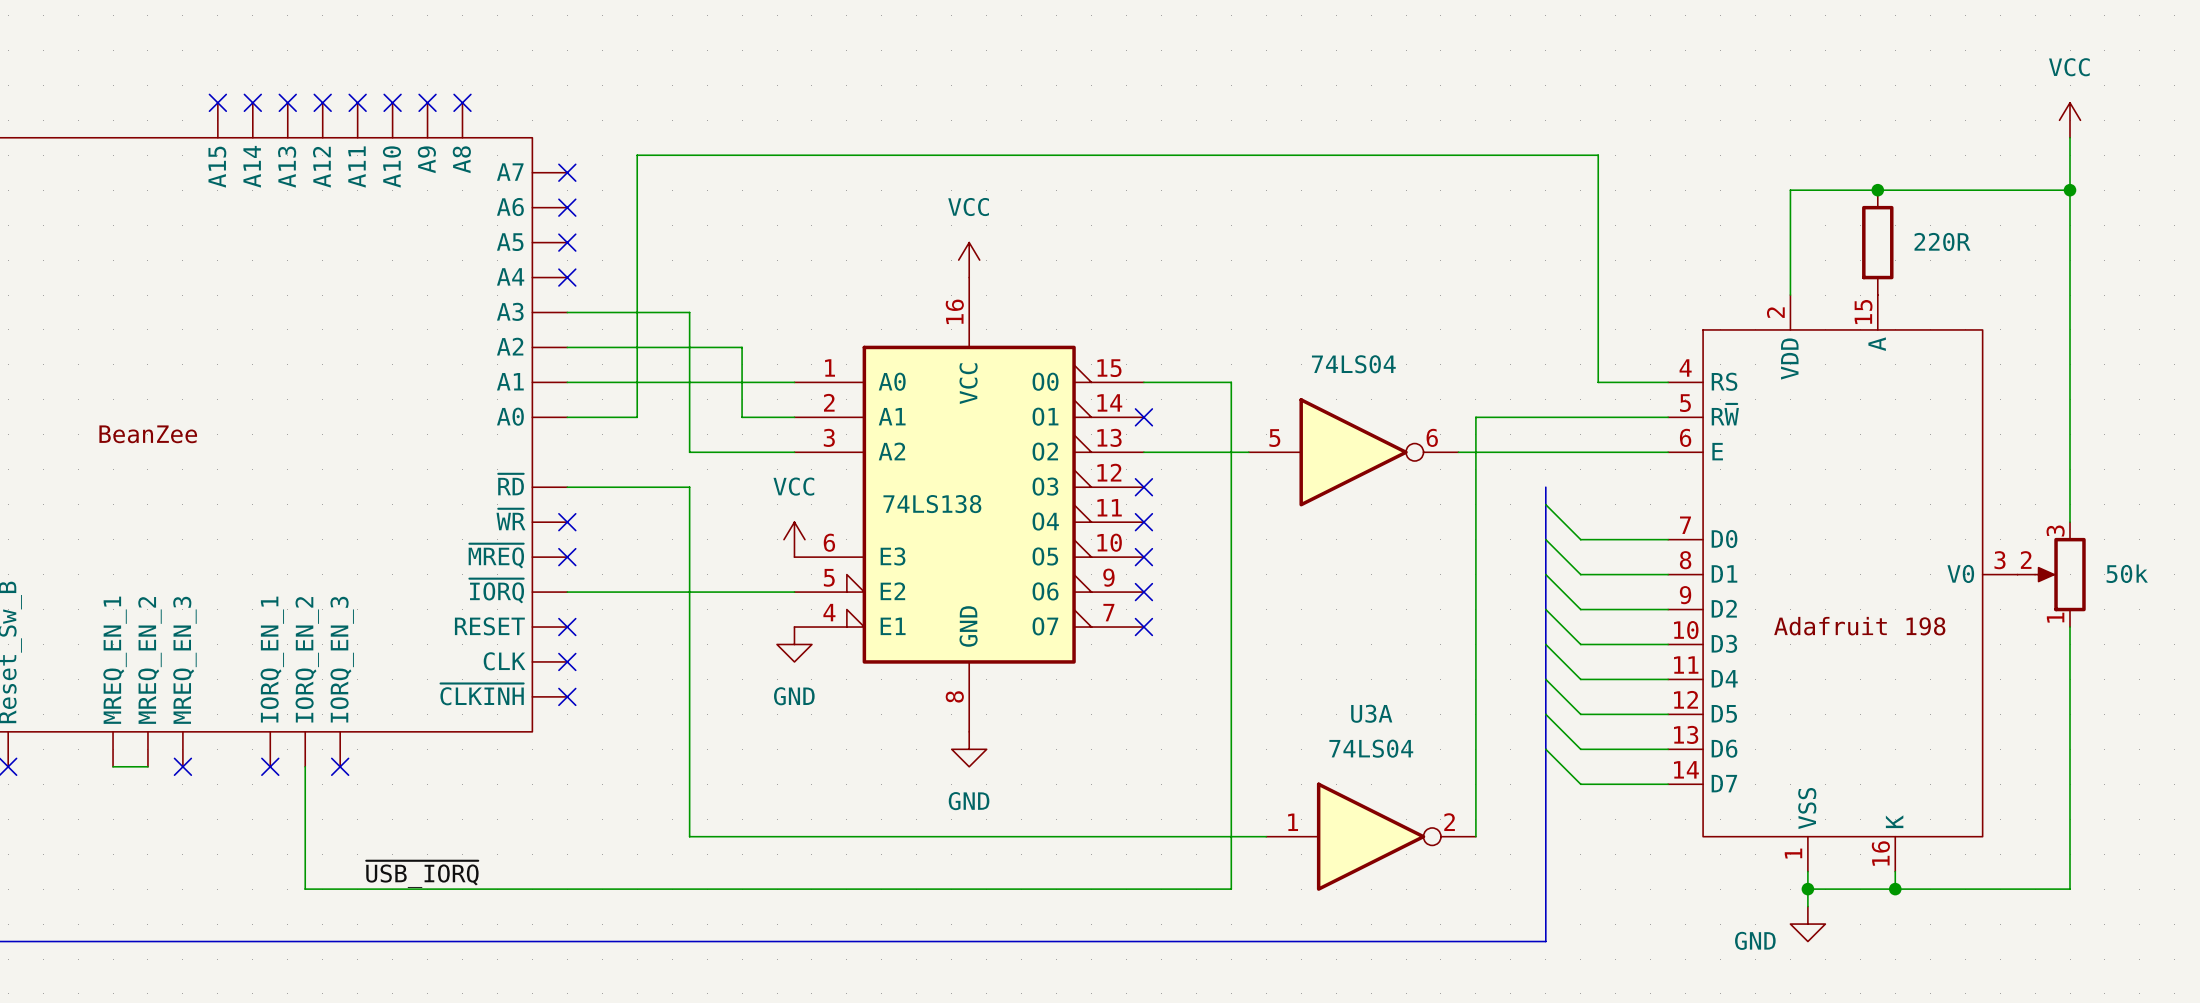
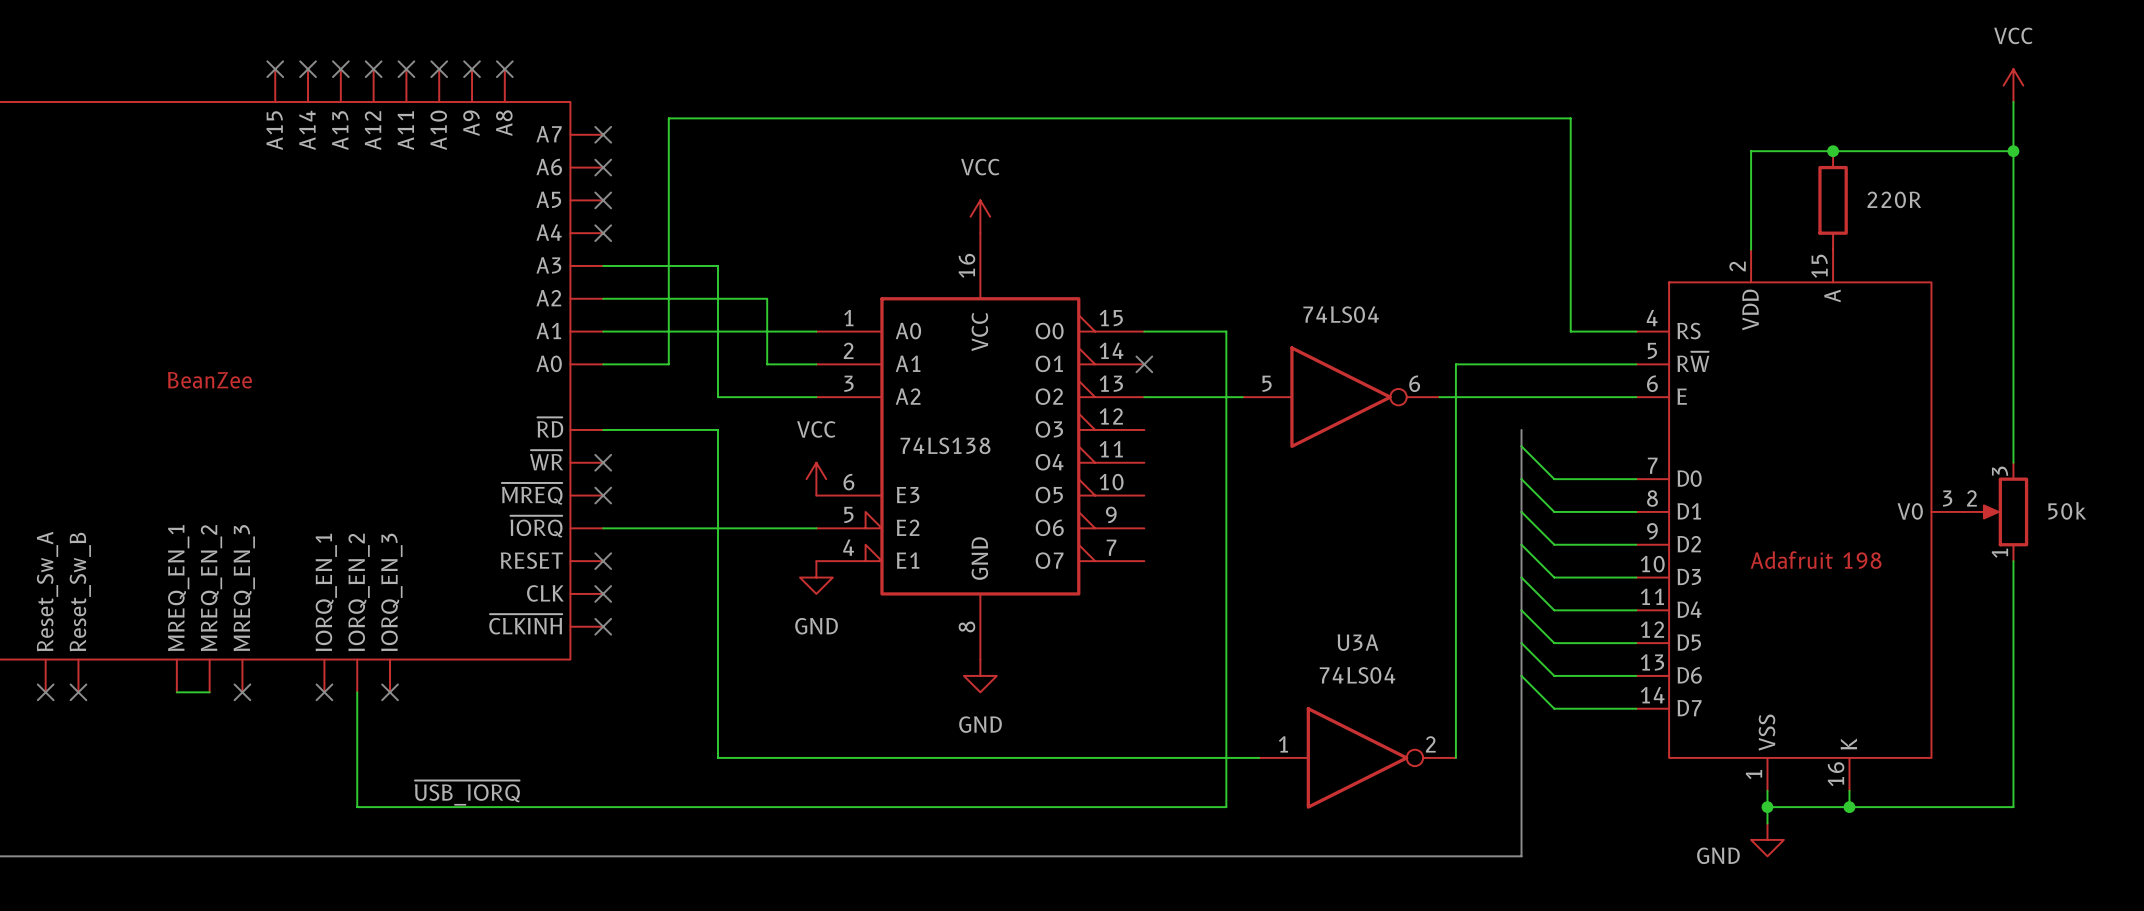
no-connect mark: (1143, 487) -> none
no-connect mark: (1143, 522) -> none
no-connect mark: (1143, 557) -> none
no-connect mark: (1143, 592) -> none
no-connect mark: (1143, 627) -> none

